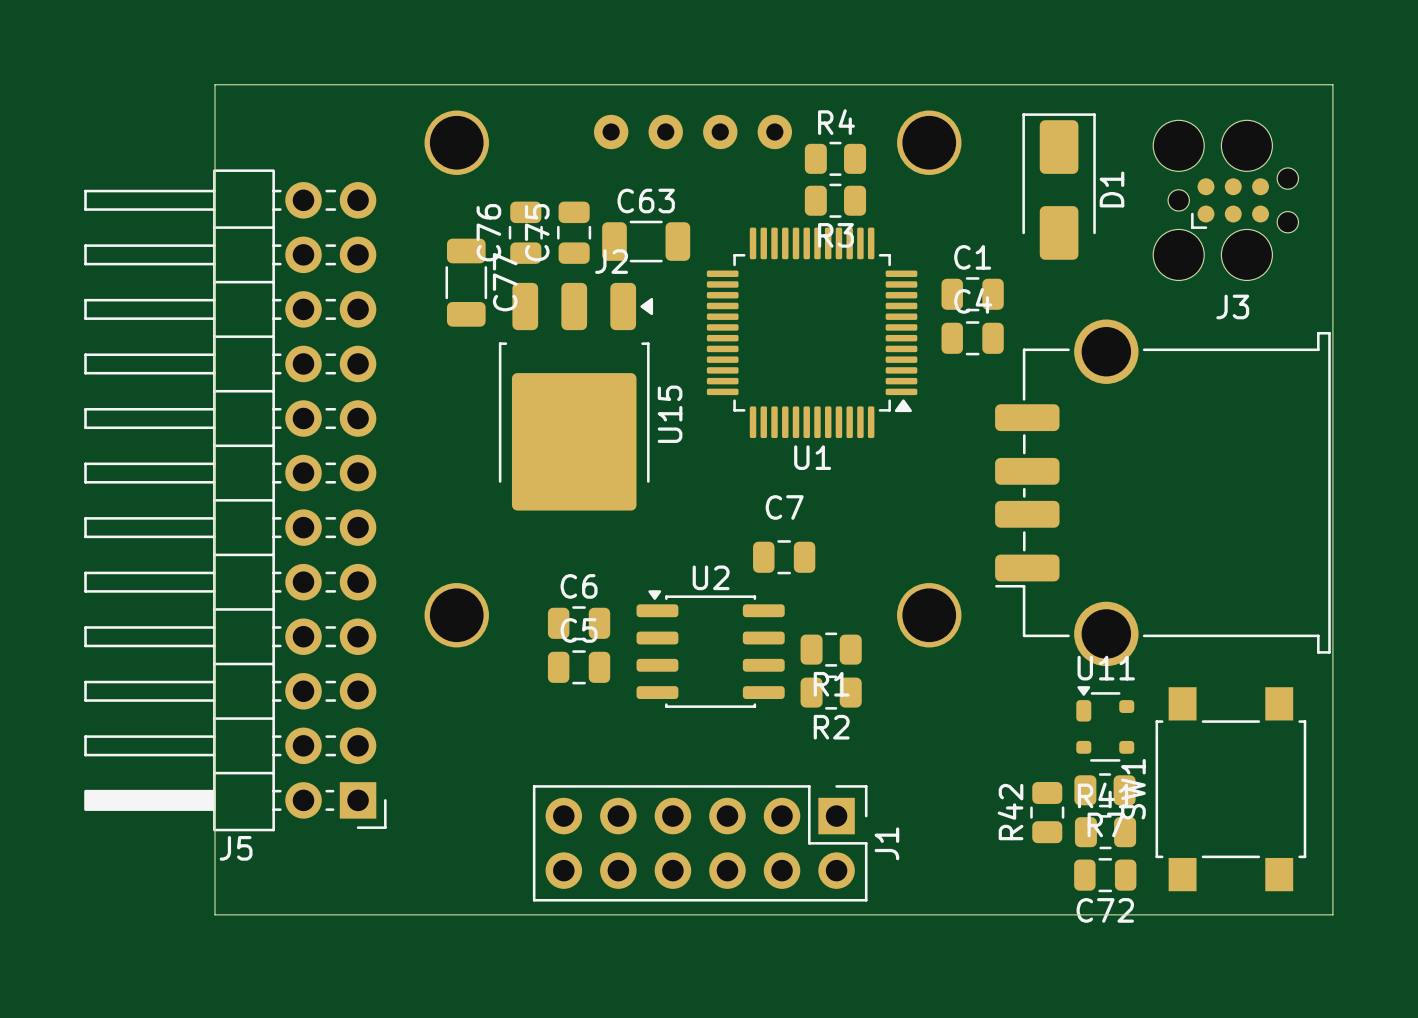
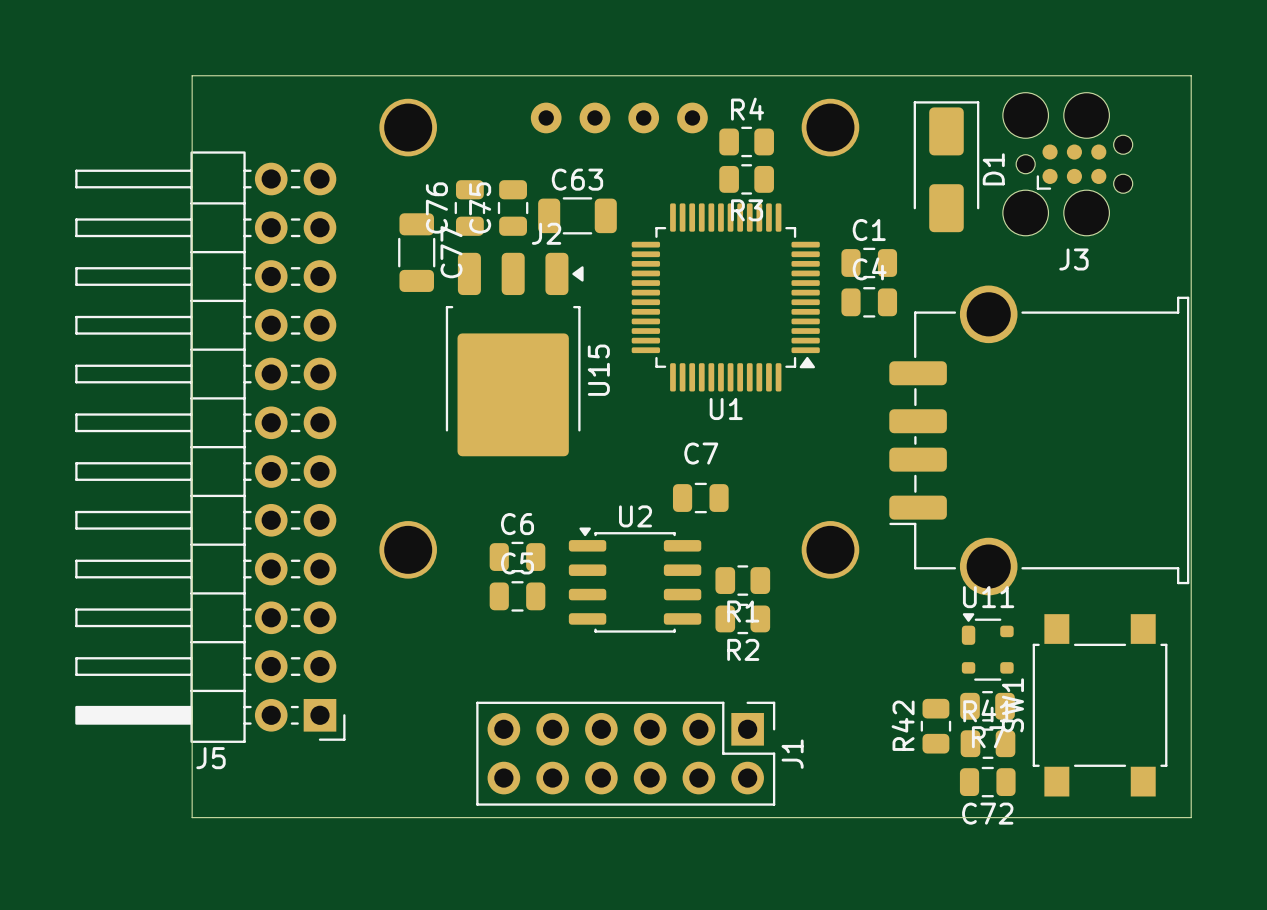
J3 position: (1225, 200) -> (1067, 164)

